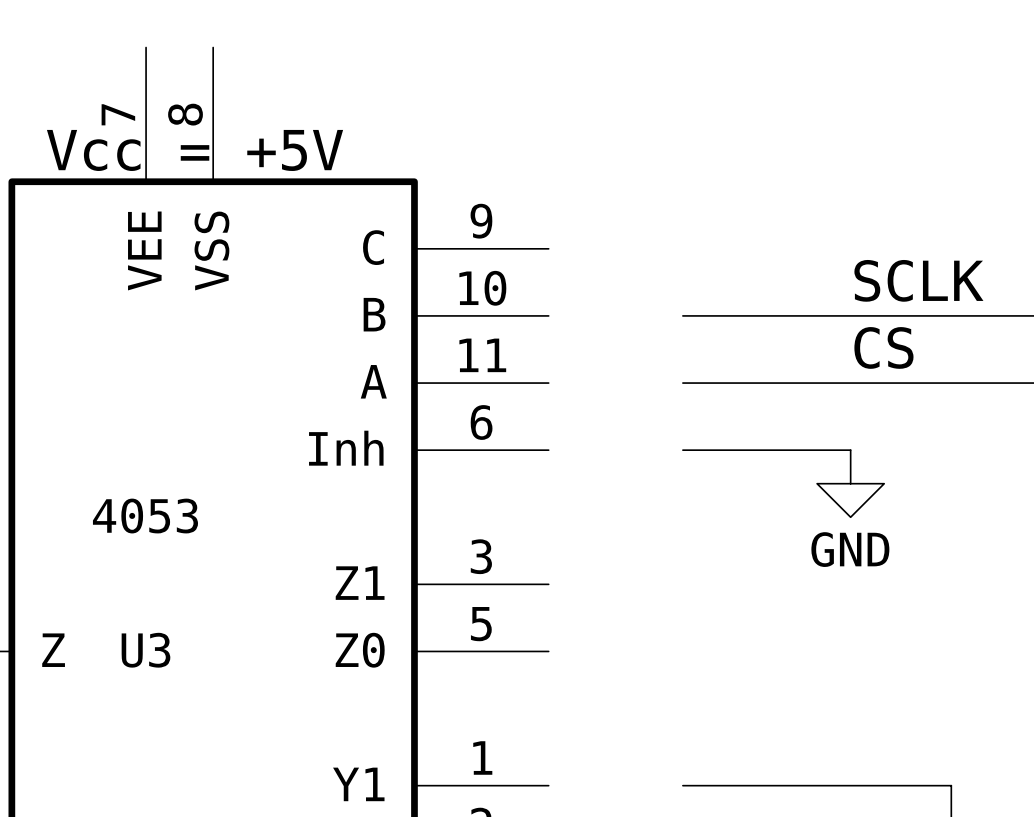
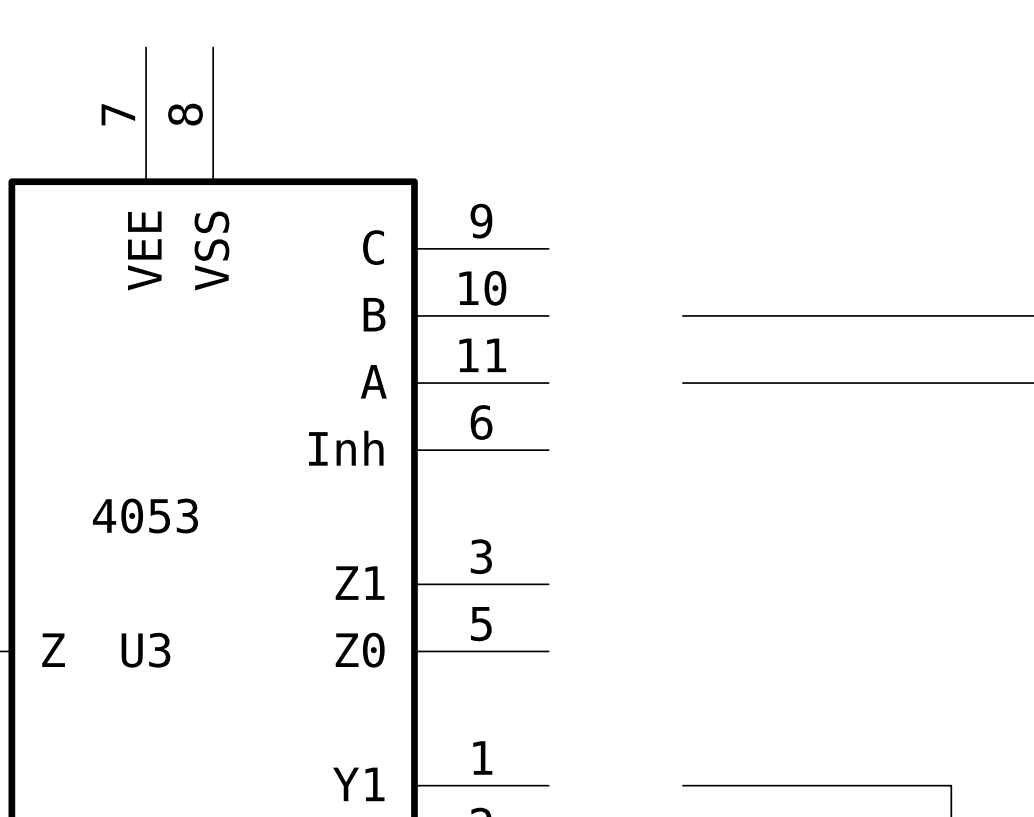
text: Vcc = +5V (195, 150) -> none
label: SCLK (918, 280) -> none
label: CS (883, 347) -> none
wire: (682, 450) (850, 450) -> none
power symbol: GND (850, 483) -> none

